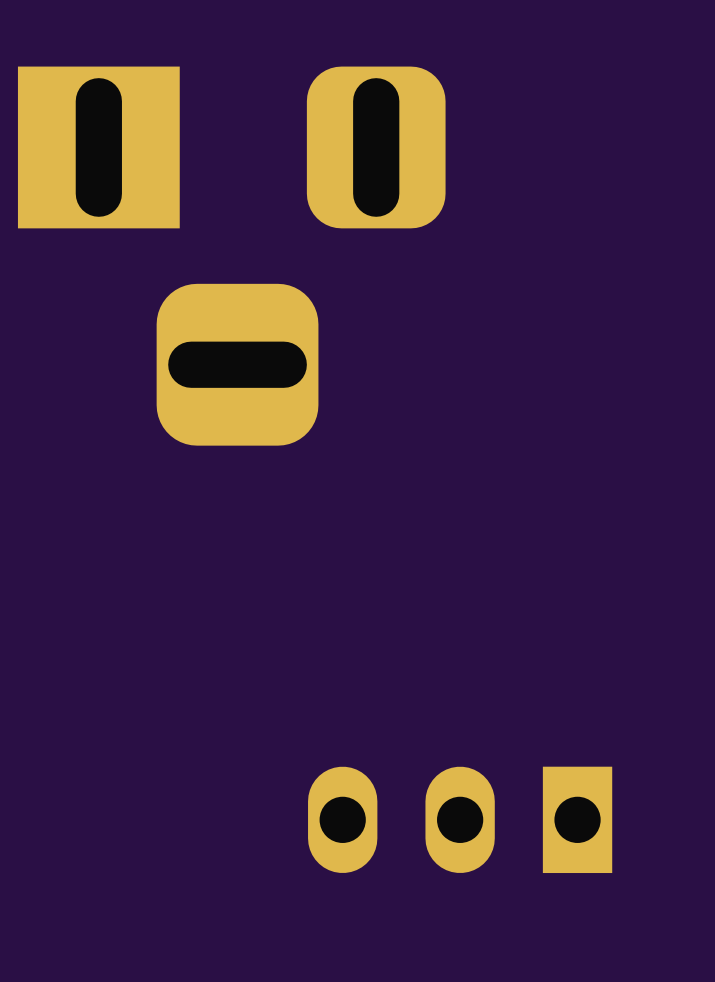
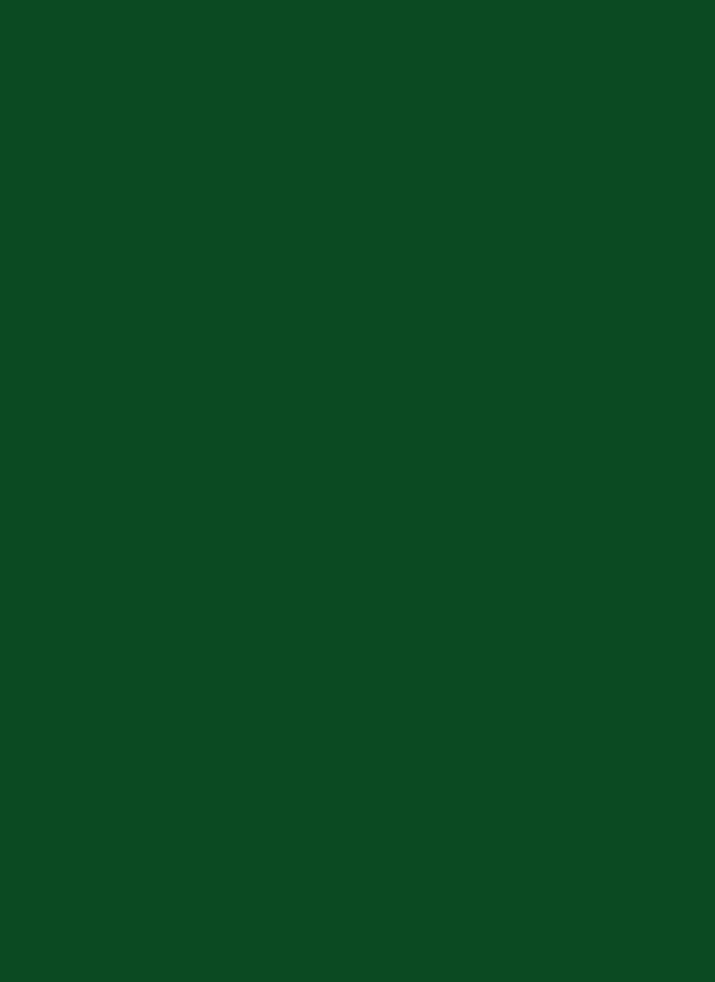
part: (231, 256) -> none
part: (460, 819) -> none

